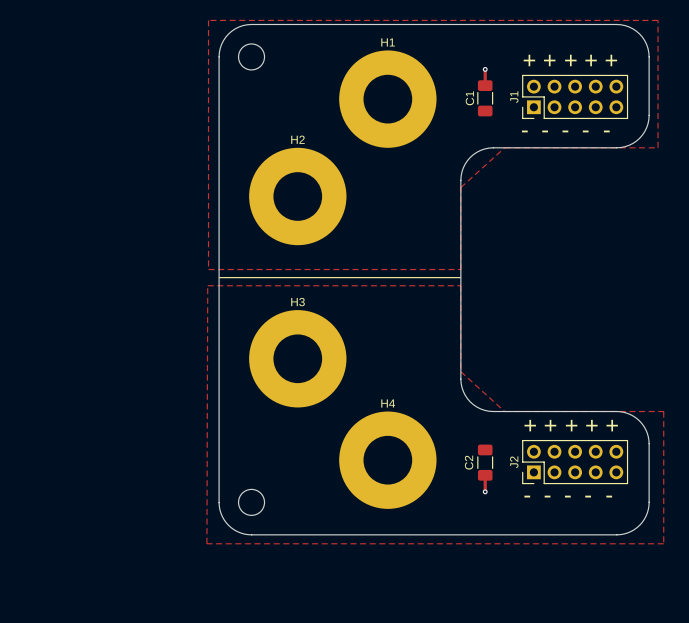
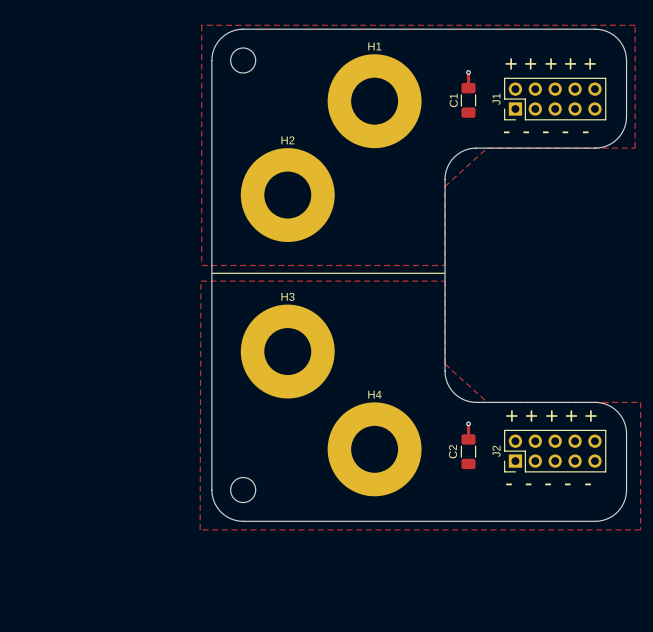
track: none -> (468, 423) (468, 439)
via: none -> (468, 423)
track: (485, 475) (485, 491) -> none
via: (485, 491) -> none

